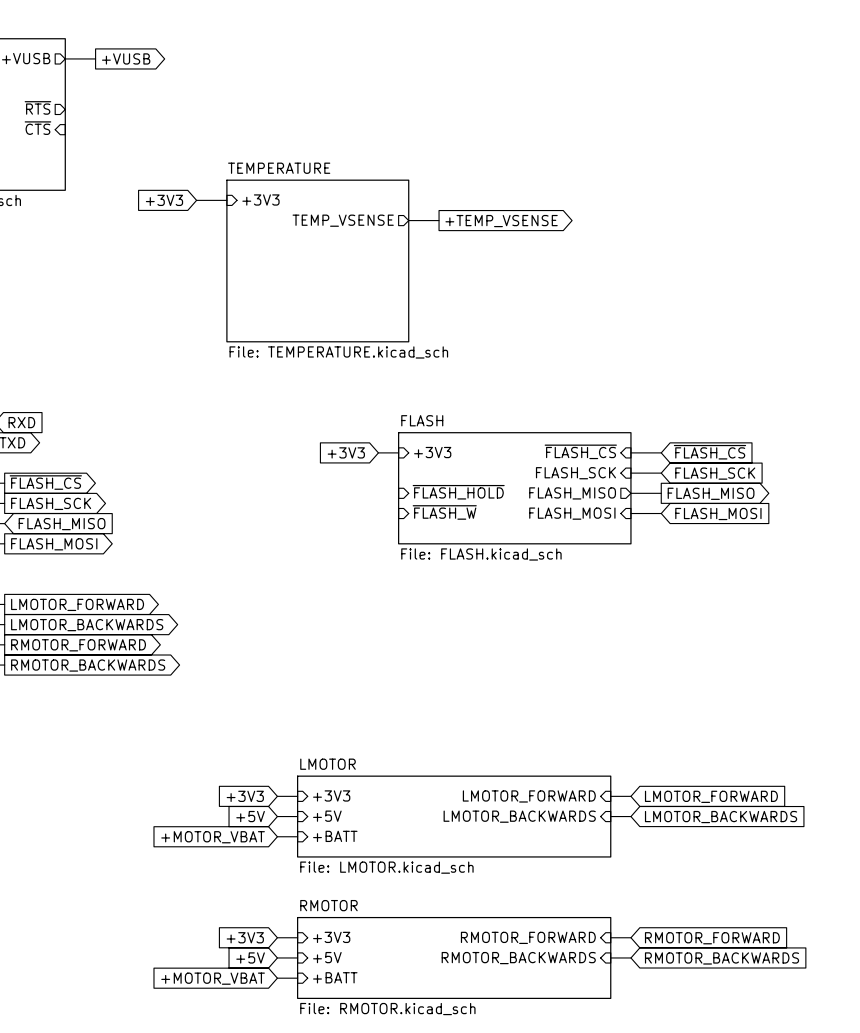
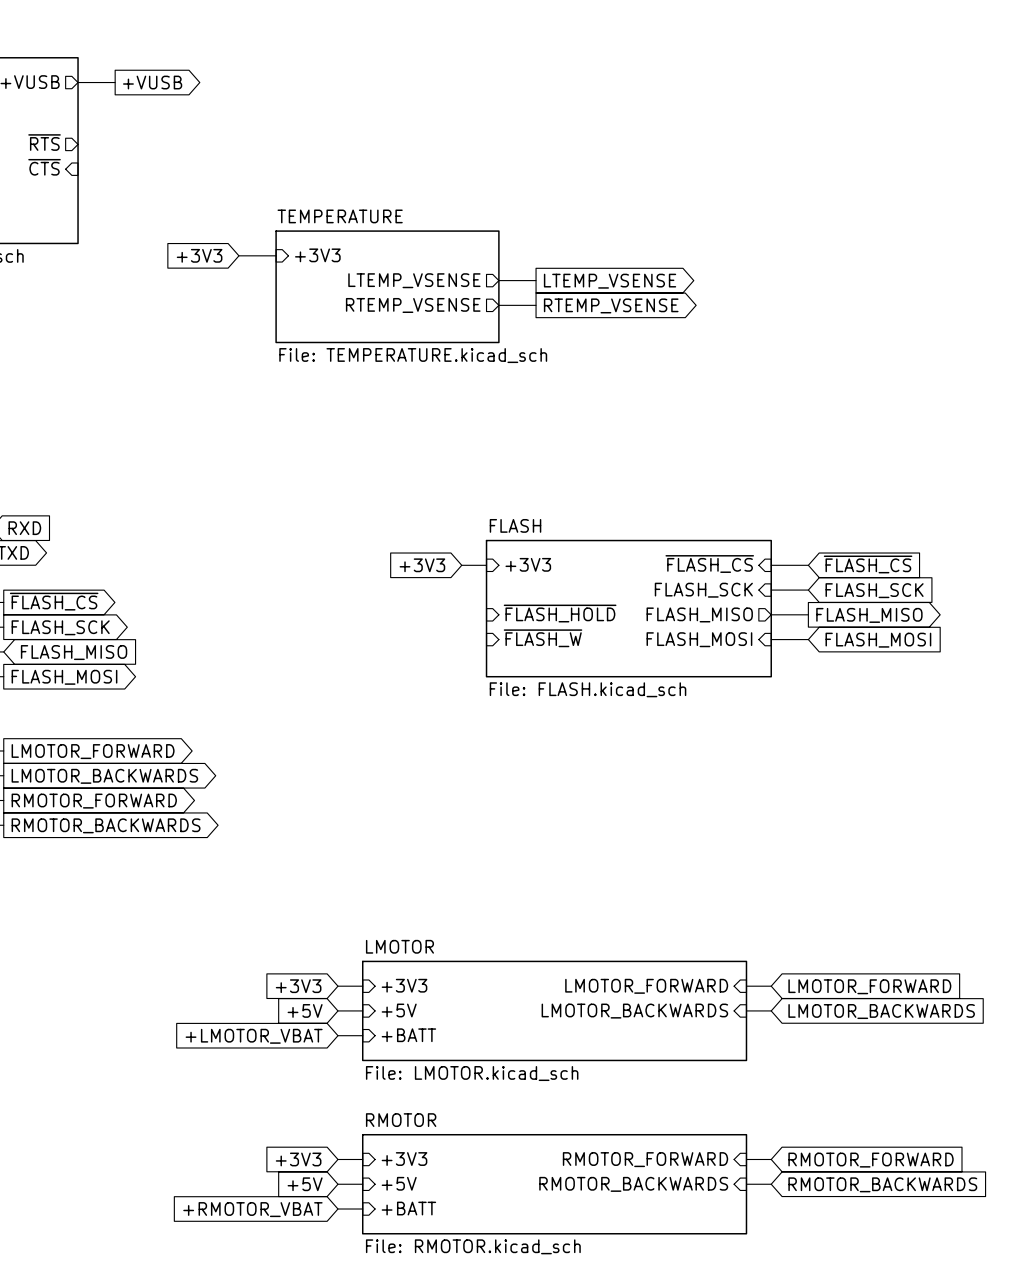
sheet pin: TEMP_VSENSE (343, 220) -> LTEMP_VSENSE (414, 280)
global label: +TEMP_VSENSE (501, 221) -> LTEMP_VSENSE (610, 281)
sheet TEMPERATURE: none -> File: TEMPERATURE.kicad_sch (387, 286)
sheet pin: none -> RTEMP_VSENSE (413, 305)
wire: none -> (498, 305) (536, 305)
global label: none -> RTEMP_VSENSE (611, 305)
sheet TEMPERATURE: File: TEMPERATURE.kicad_sch (317, 260) -> none
global label: +MOTOR_VBAT (213, 837) -> +LMOTOR_VBAT (254, 1036)
global label: +MOTOR_VBAT (213, 978) -> +RMOTOR_VBAT (252, 1209)

